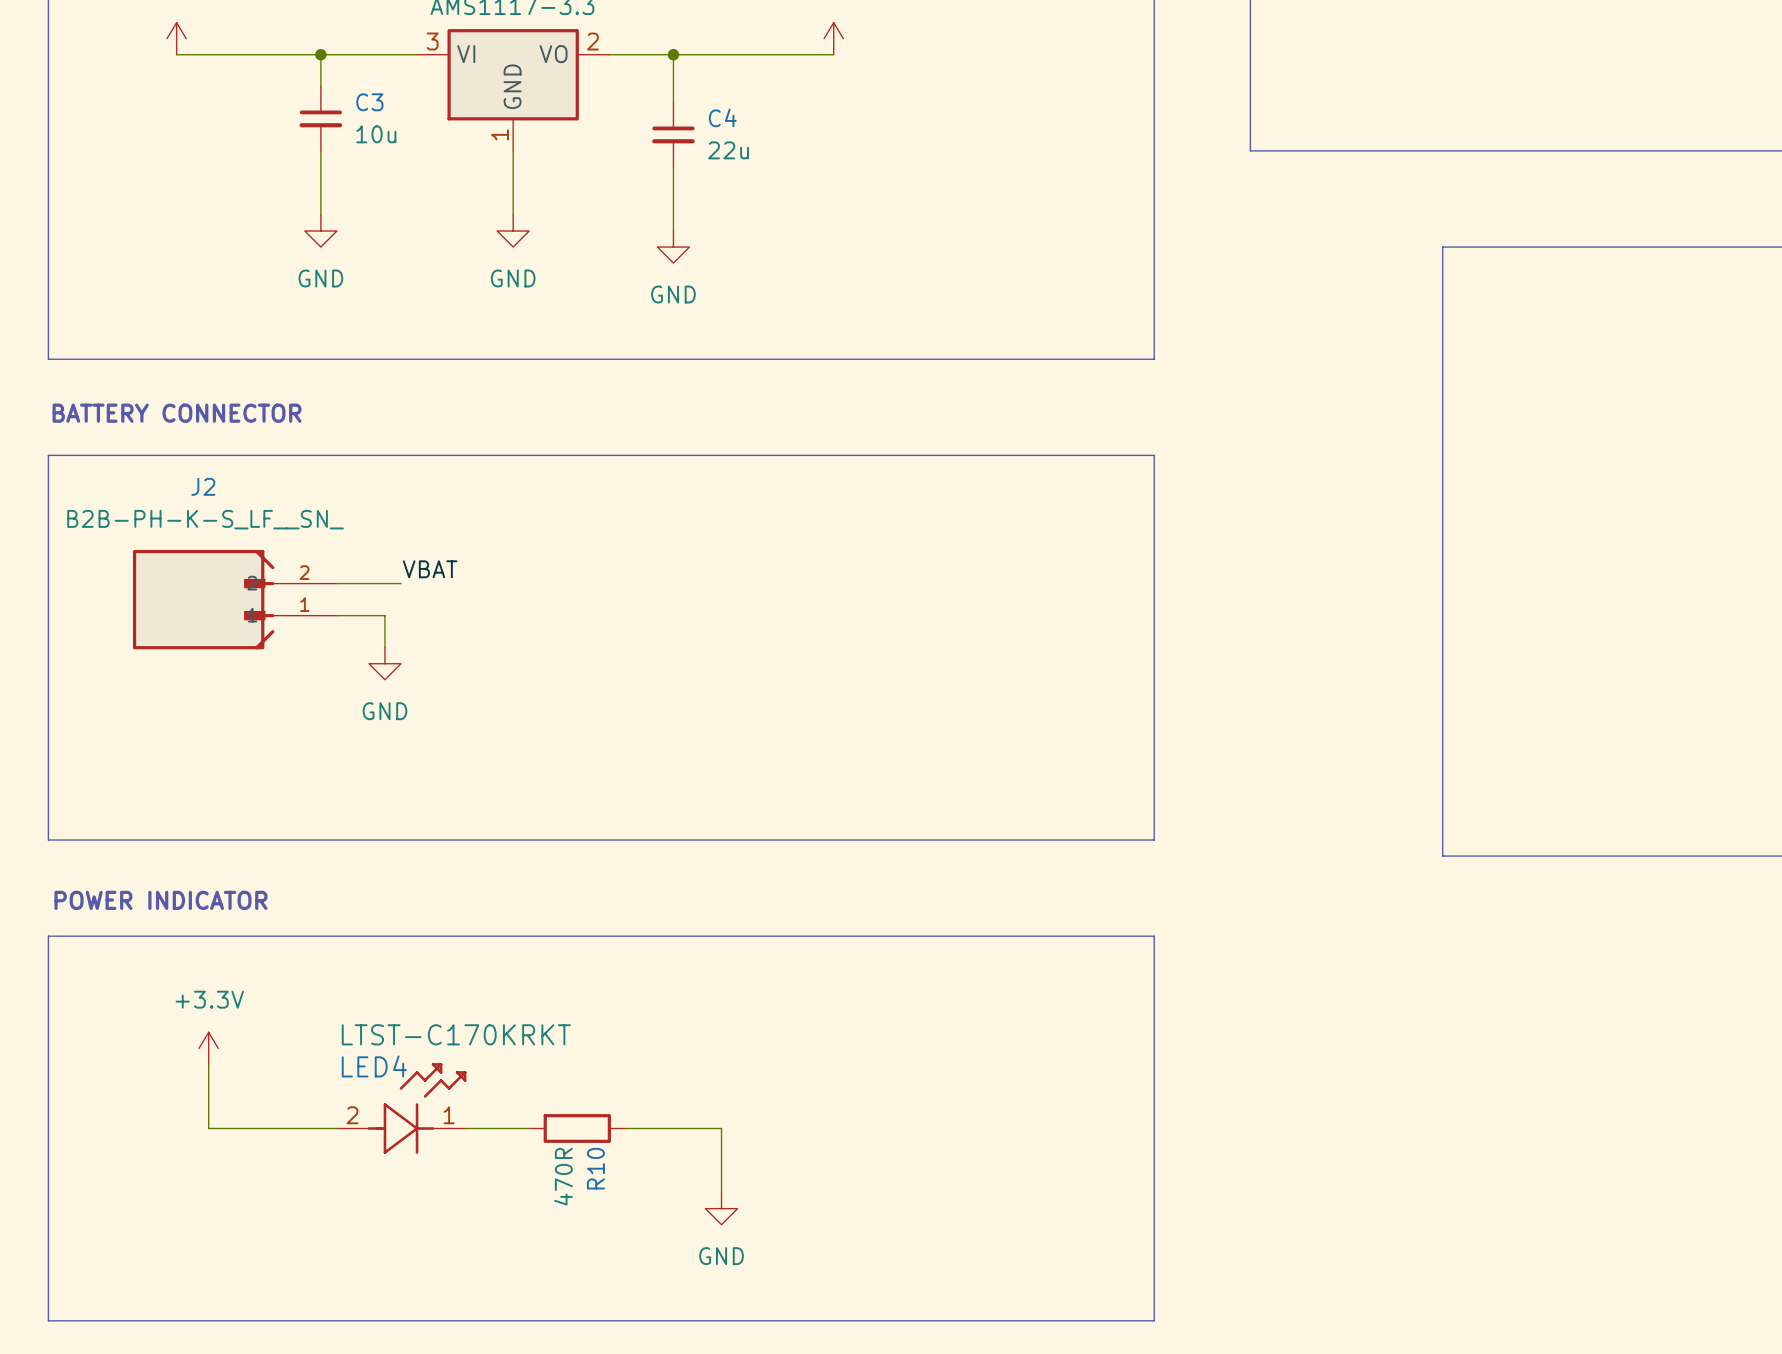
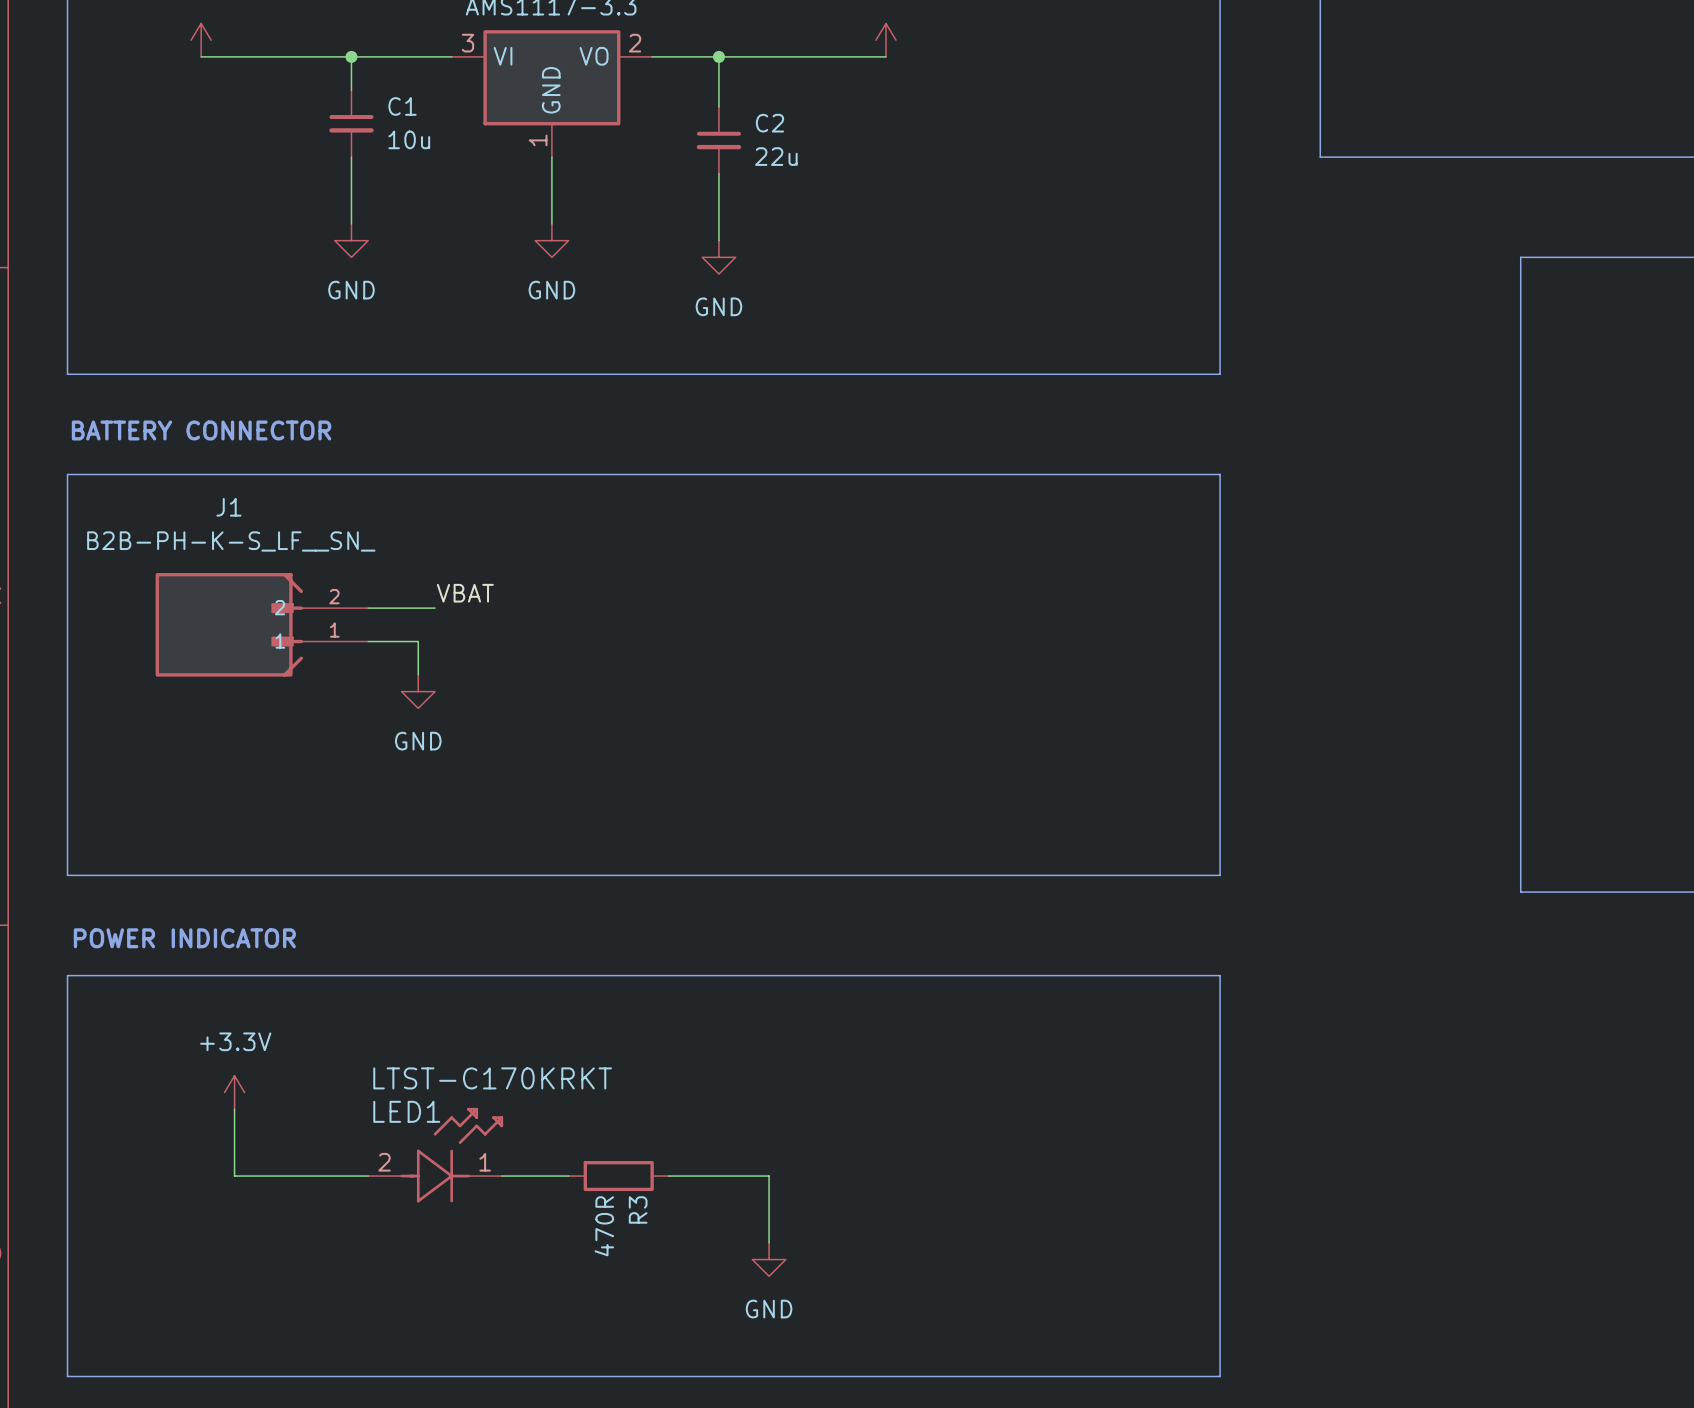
C3 name: C3 (369, 102) -> C1 (402, 106)
C4 name: C4 (722, 117) -> C2 (769, 123)
J2 name: J2 (203, 486) -> J1 (228, 507)
LED4 name: LED4 (374, 1066) -> LED1 (406, 1111)
R10 name: R10 (595, 1168) -> R3 (638, 1209)

